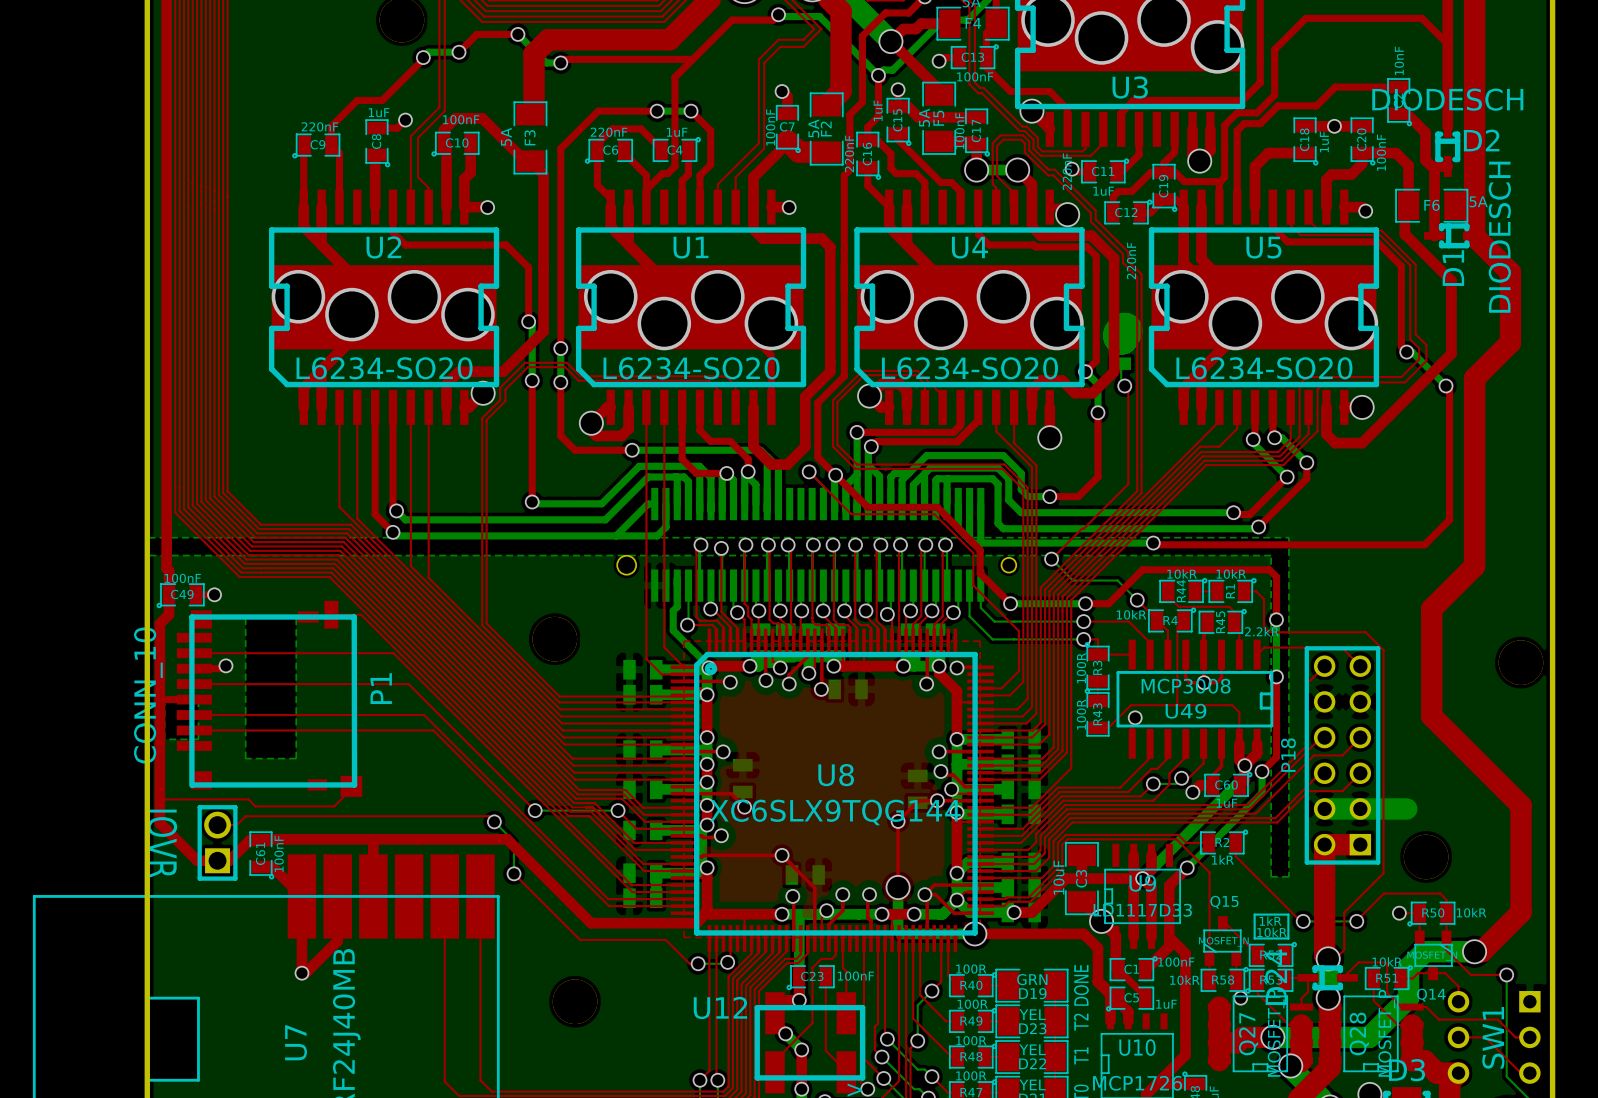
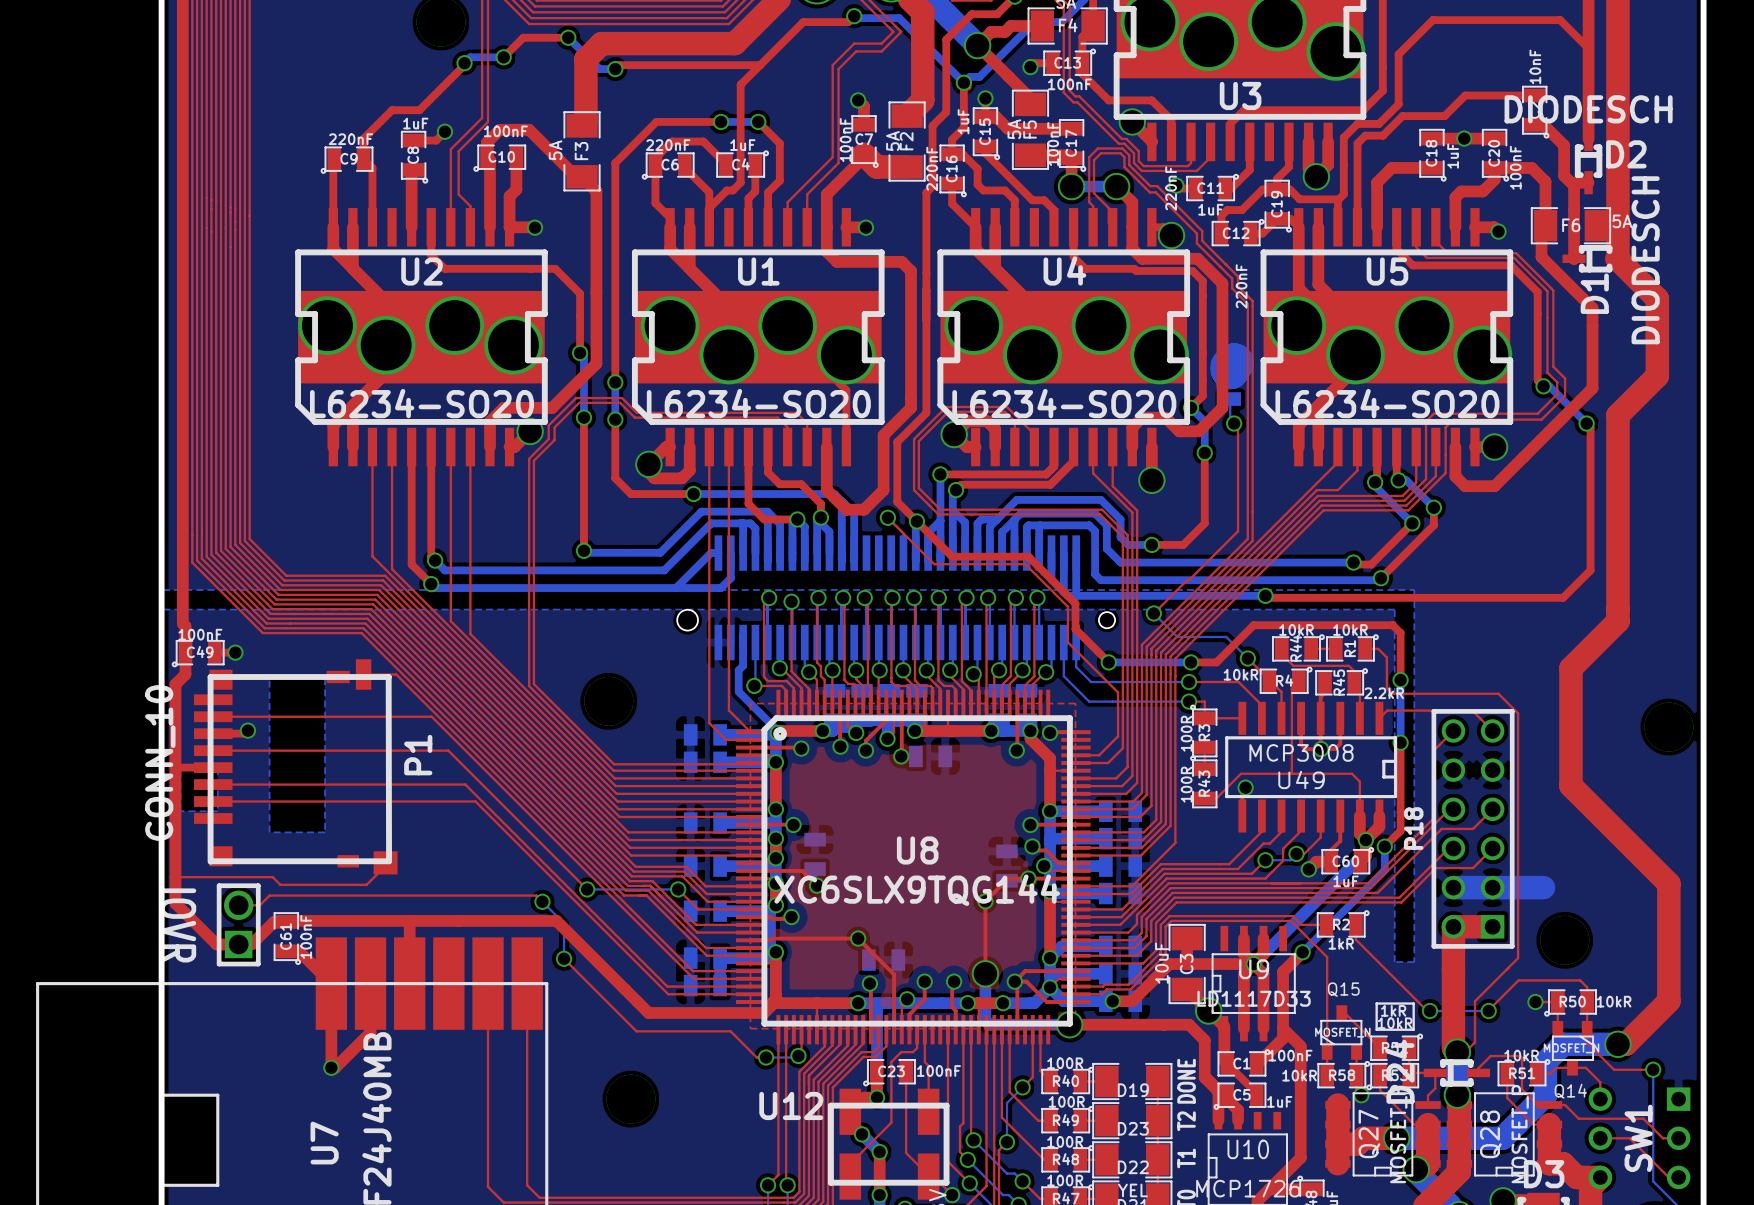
D19 value: GRN (1032, 979) -> none
D23 value: YEL (1032, 1014) -> none
D22 value: YEL (1032, 1049) -> none

